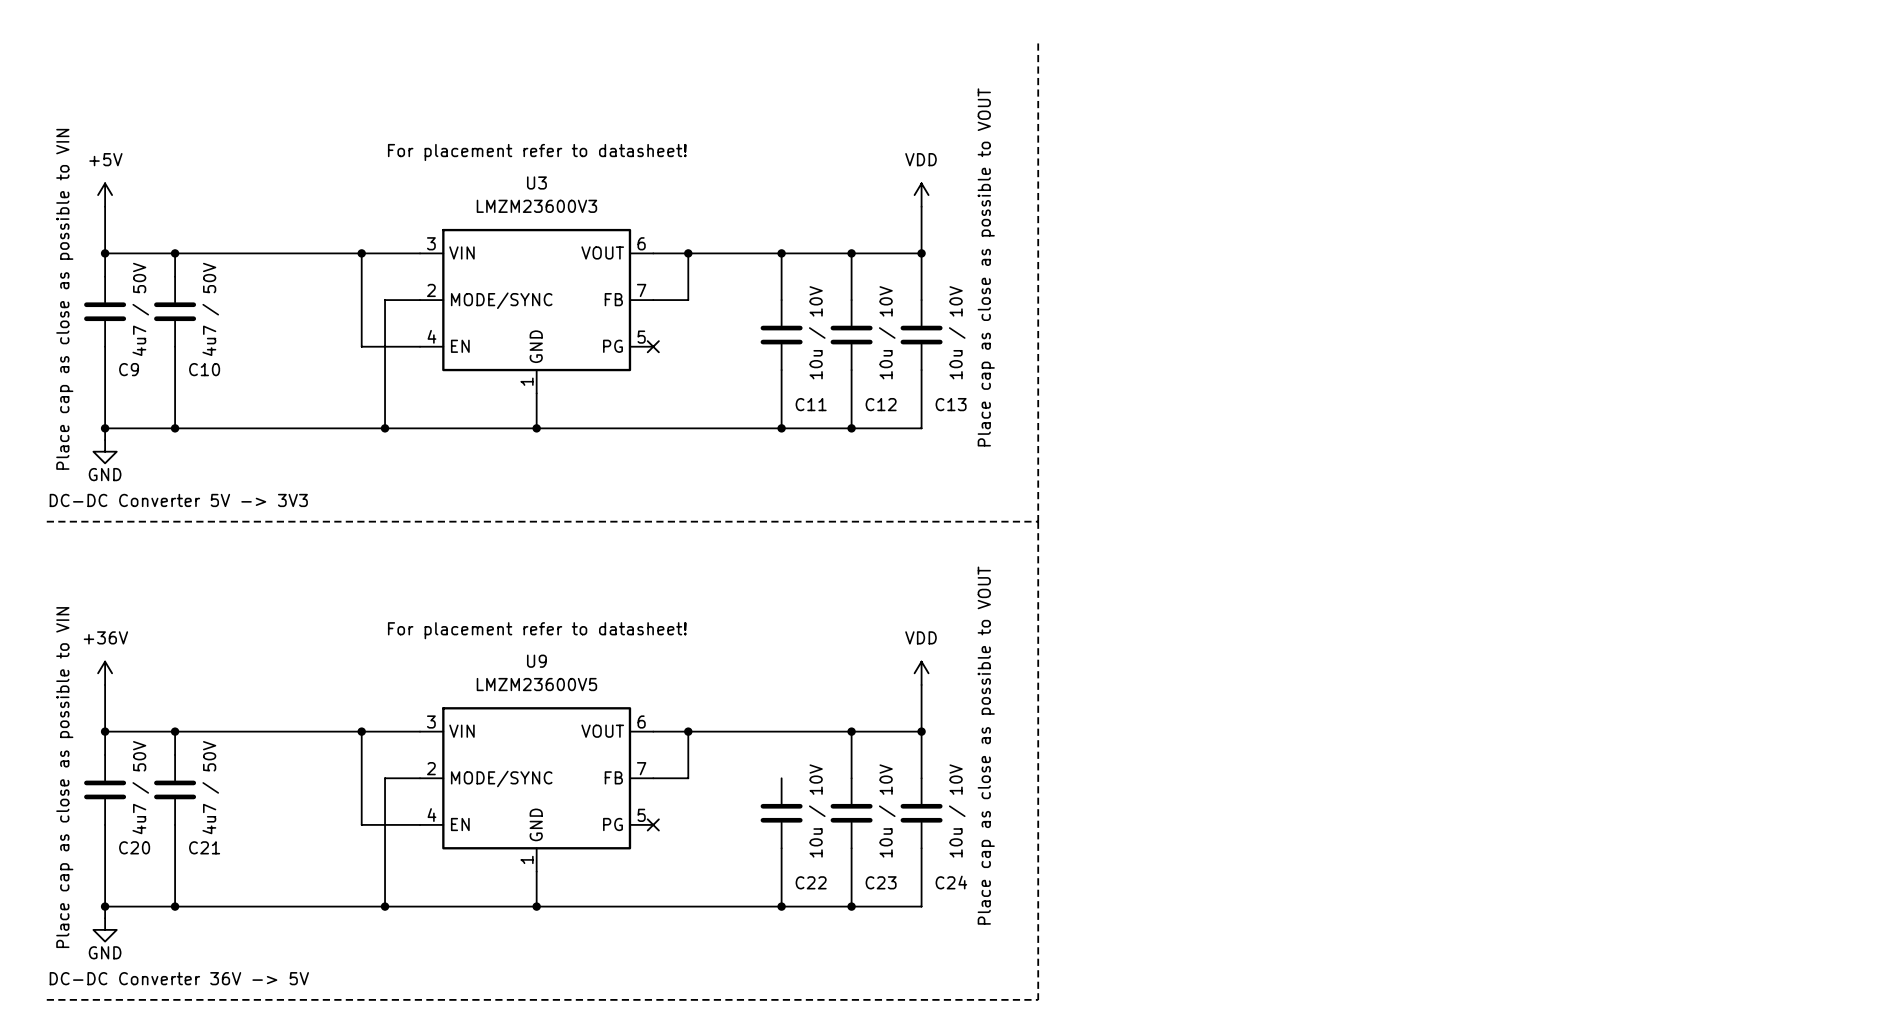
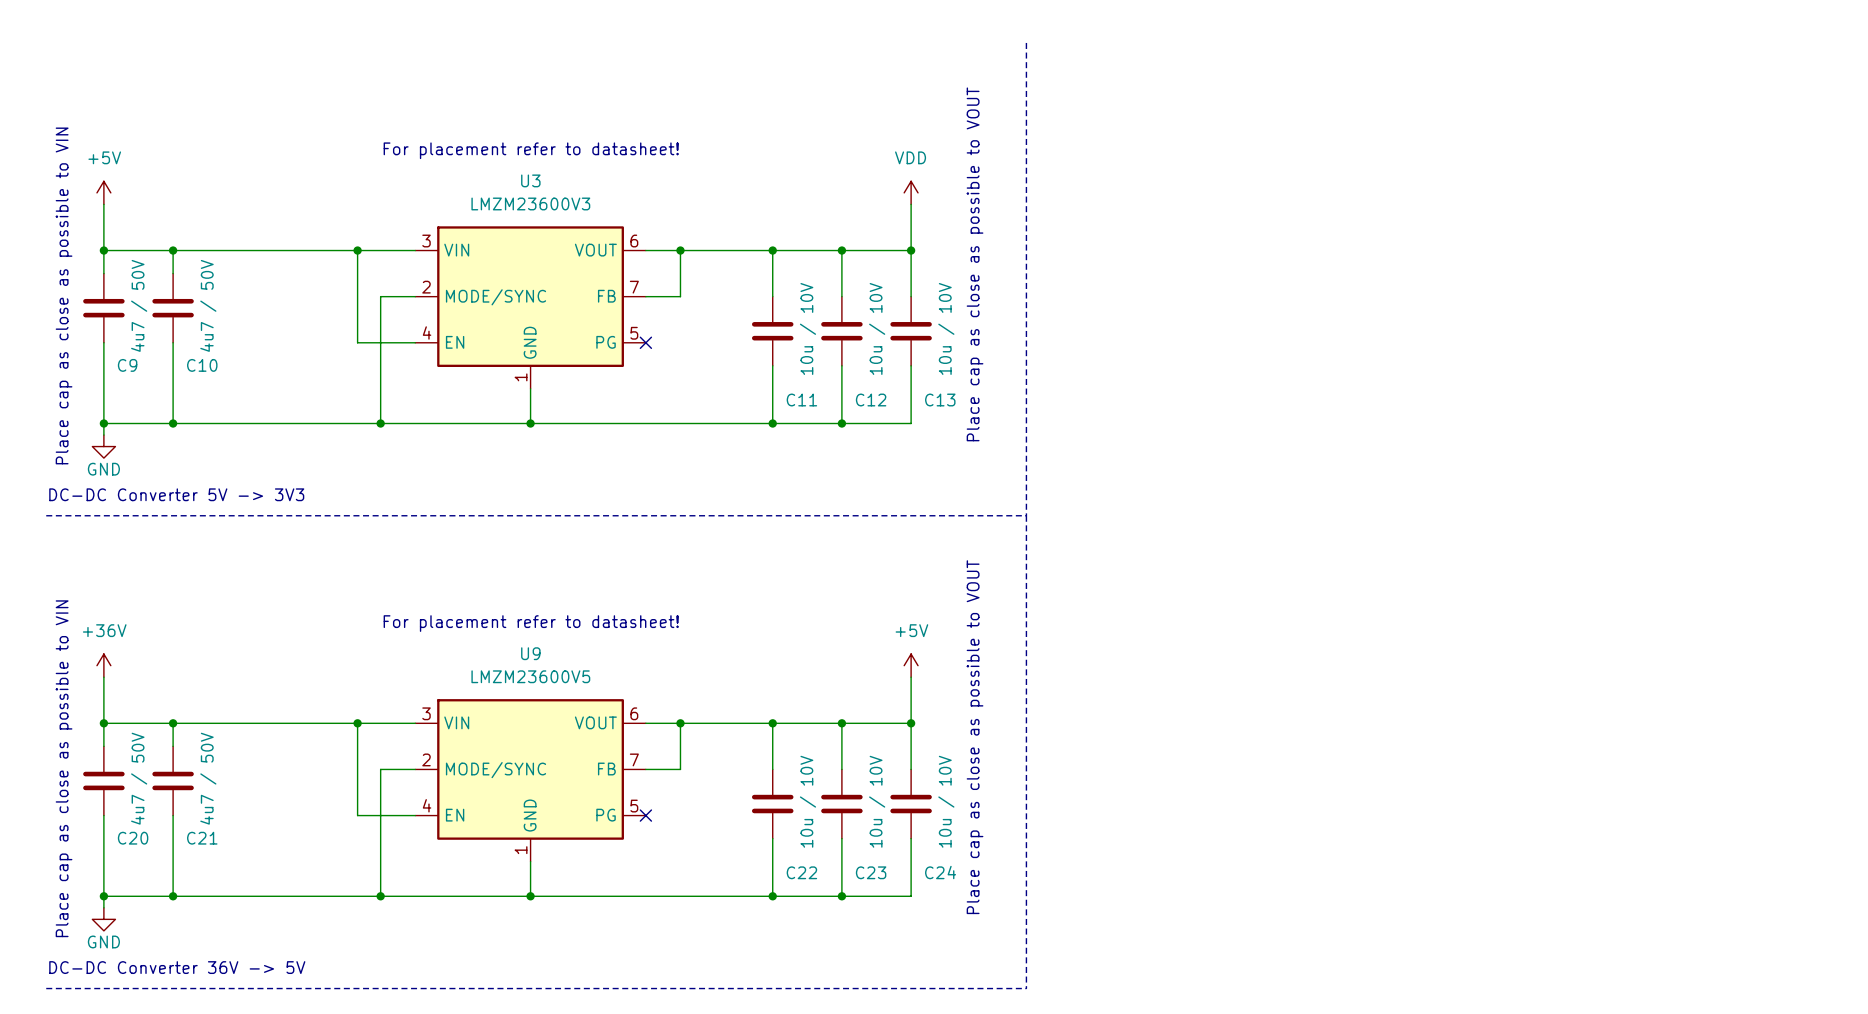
power symbol: VDD (921, 673) -> +5V (911, 665)
wire: none -> (772, 723) (772, 769)
junction: none -> (772, 723)

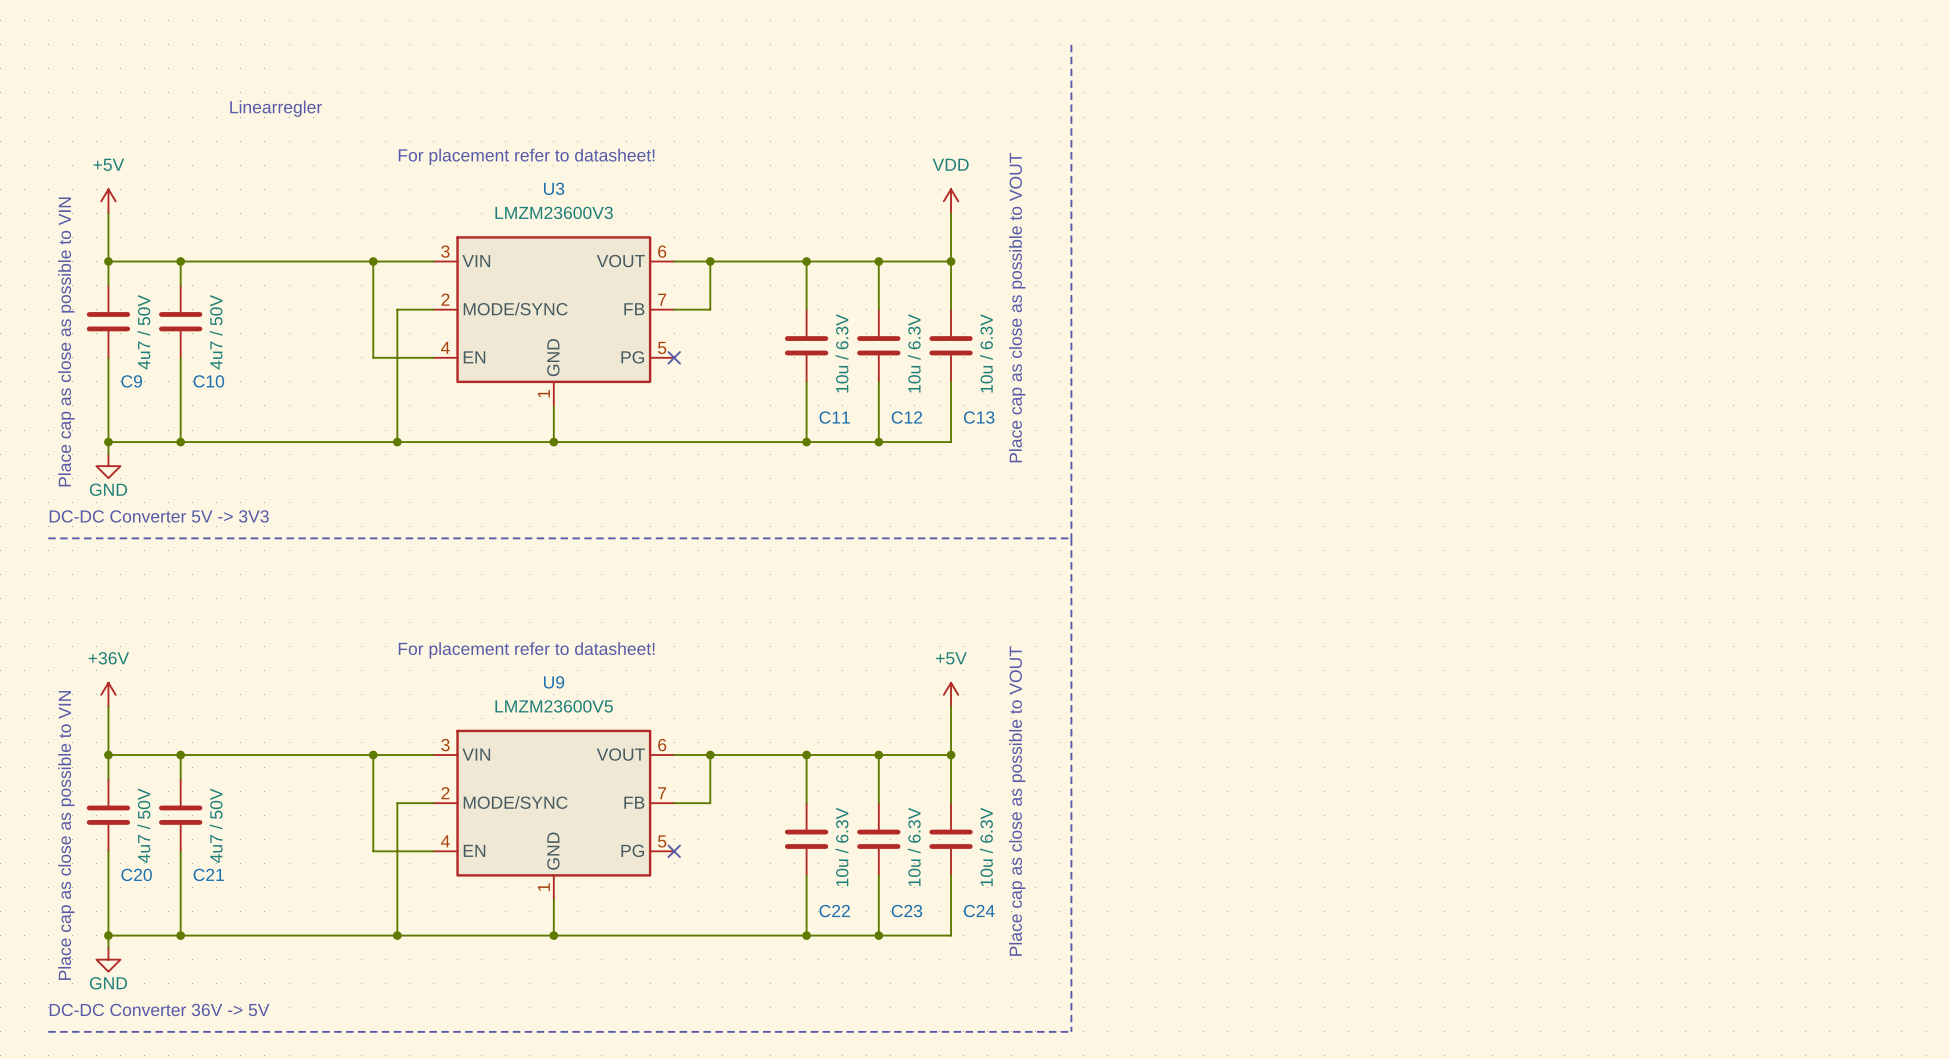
text: none -> Linearregler (276, 108)
C11 value: 10u / 10V (807, 328) -> 10u / 6.3V (842, 353)
C12 value: 10u / 10V (877, 328) -> 10u / 6.3V (914, 353)
C13 value: 10u / 10V (946, 328) -> 10u / 6.3V (986, 353)
C22 value: 10u / 10V (807, 801) -> 10u / 6.3V (842, 846)
C23 value: 10u / 10V (877, 801) -> 10u / 6.3V (914, 846)
C24 value: 10u / 10V (946, 801) -> 10u / 6.3V (986, 846)

